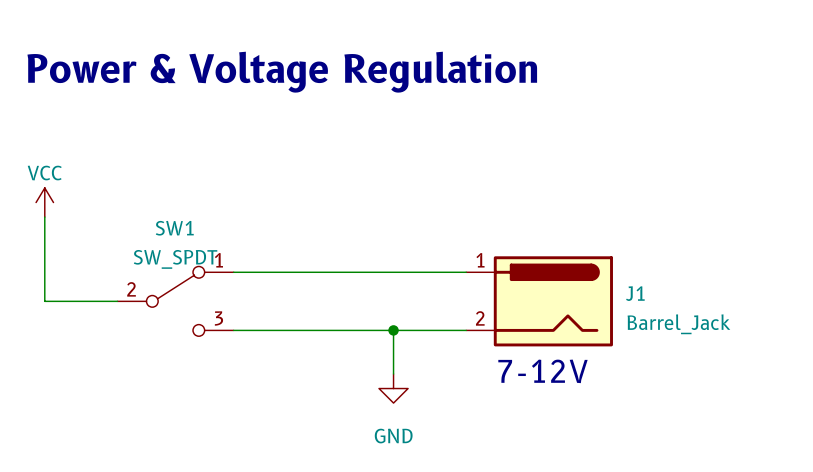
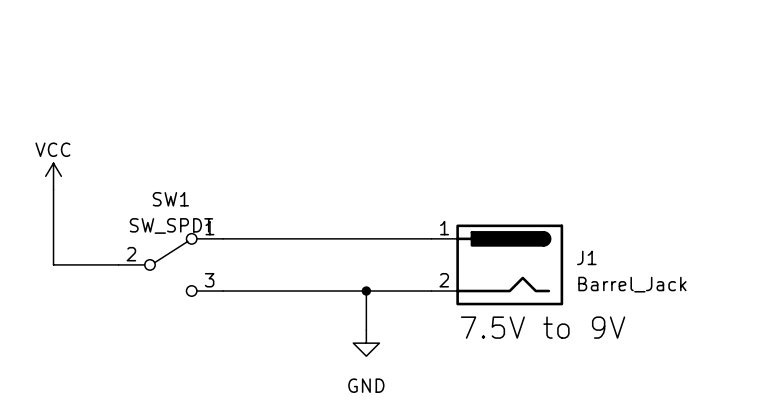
text: Power & Voltage Regulation (282, 72) -> none
text: 7-12V (542, 371) -> 7.5V to 9V (543, 327)

